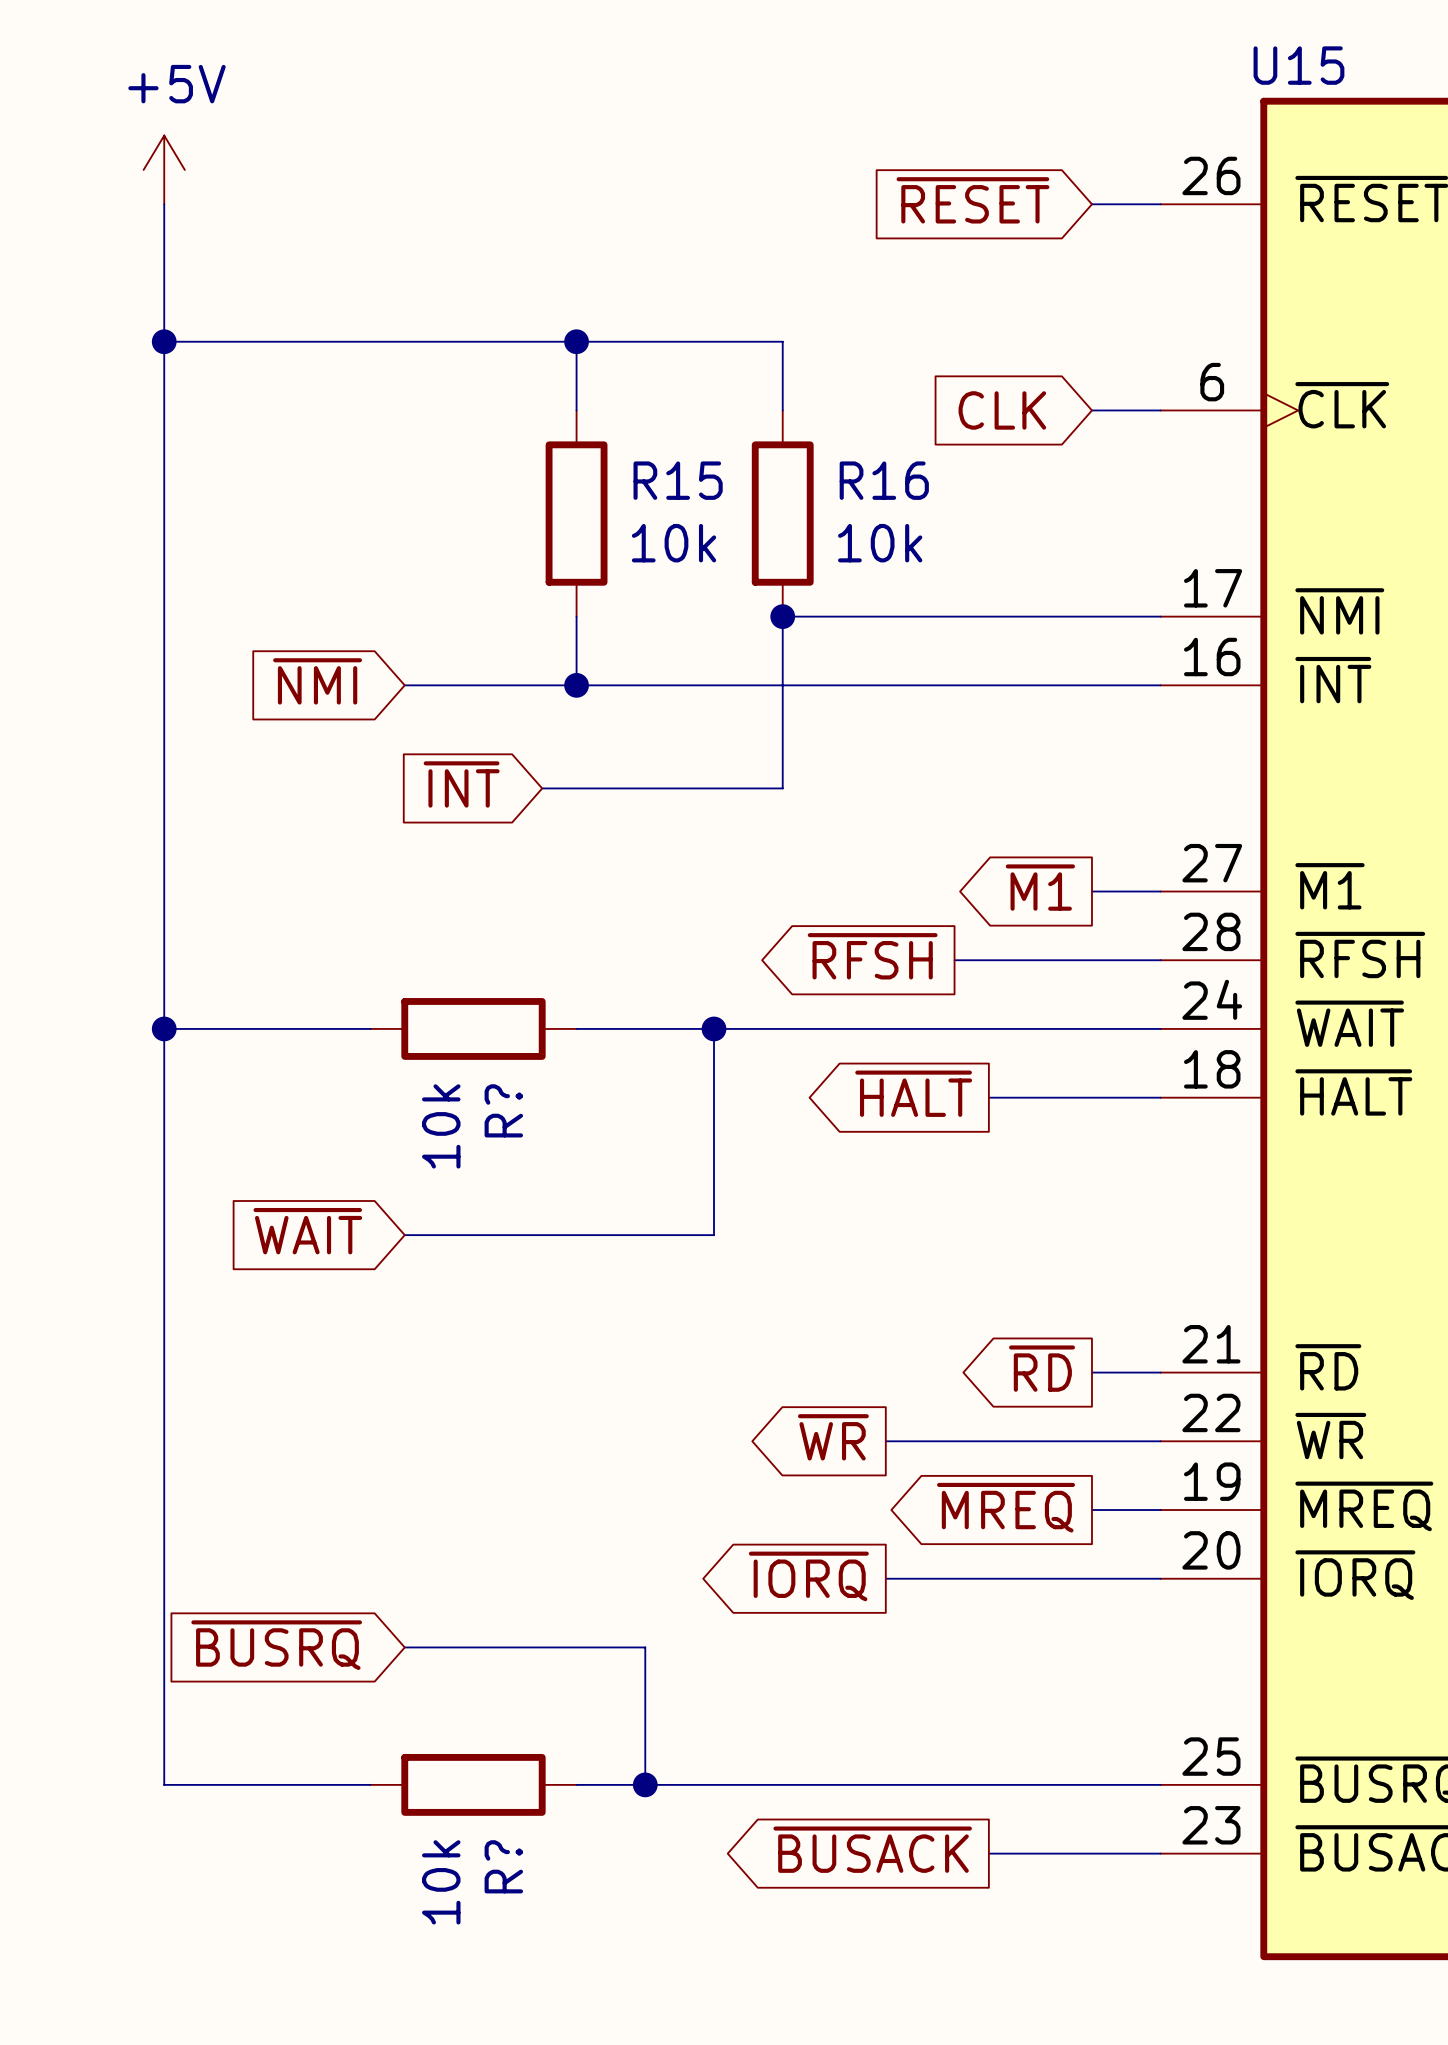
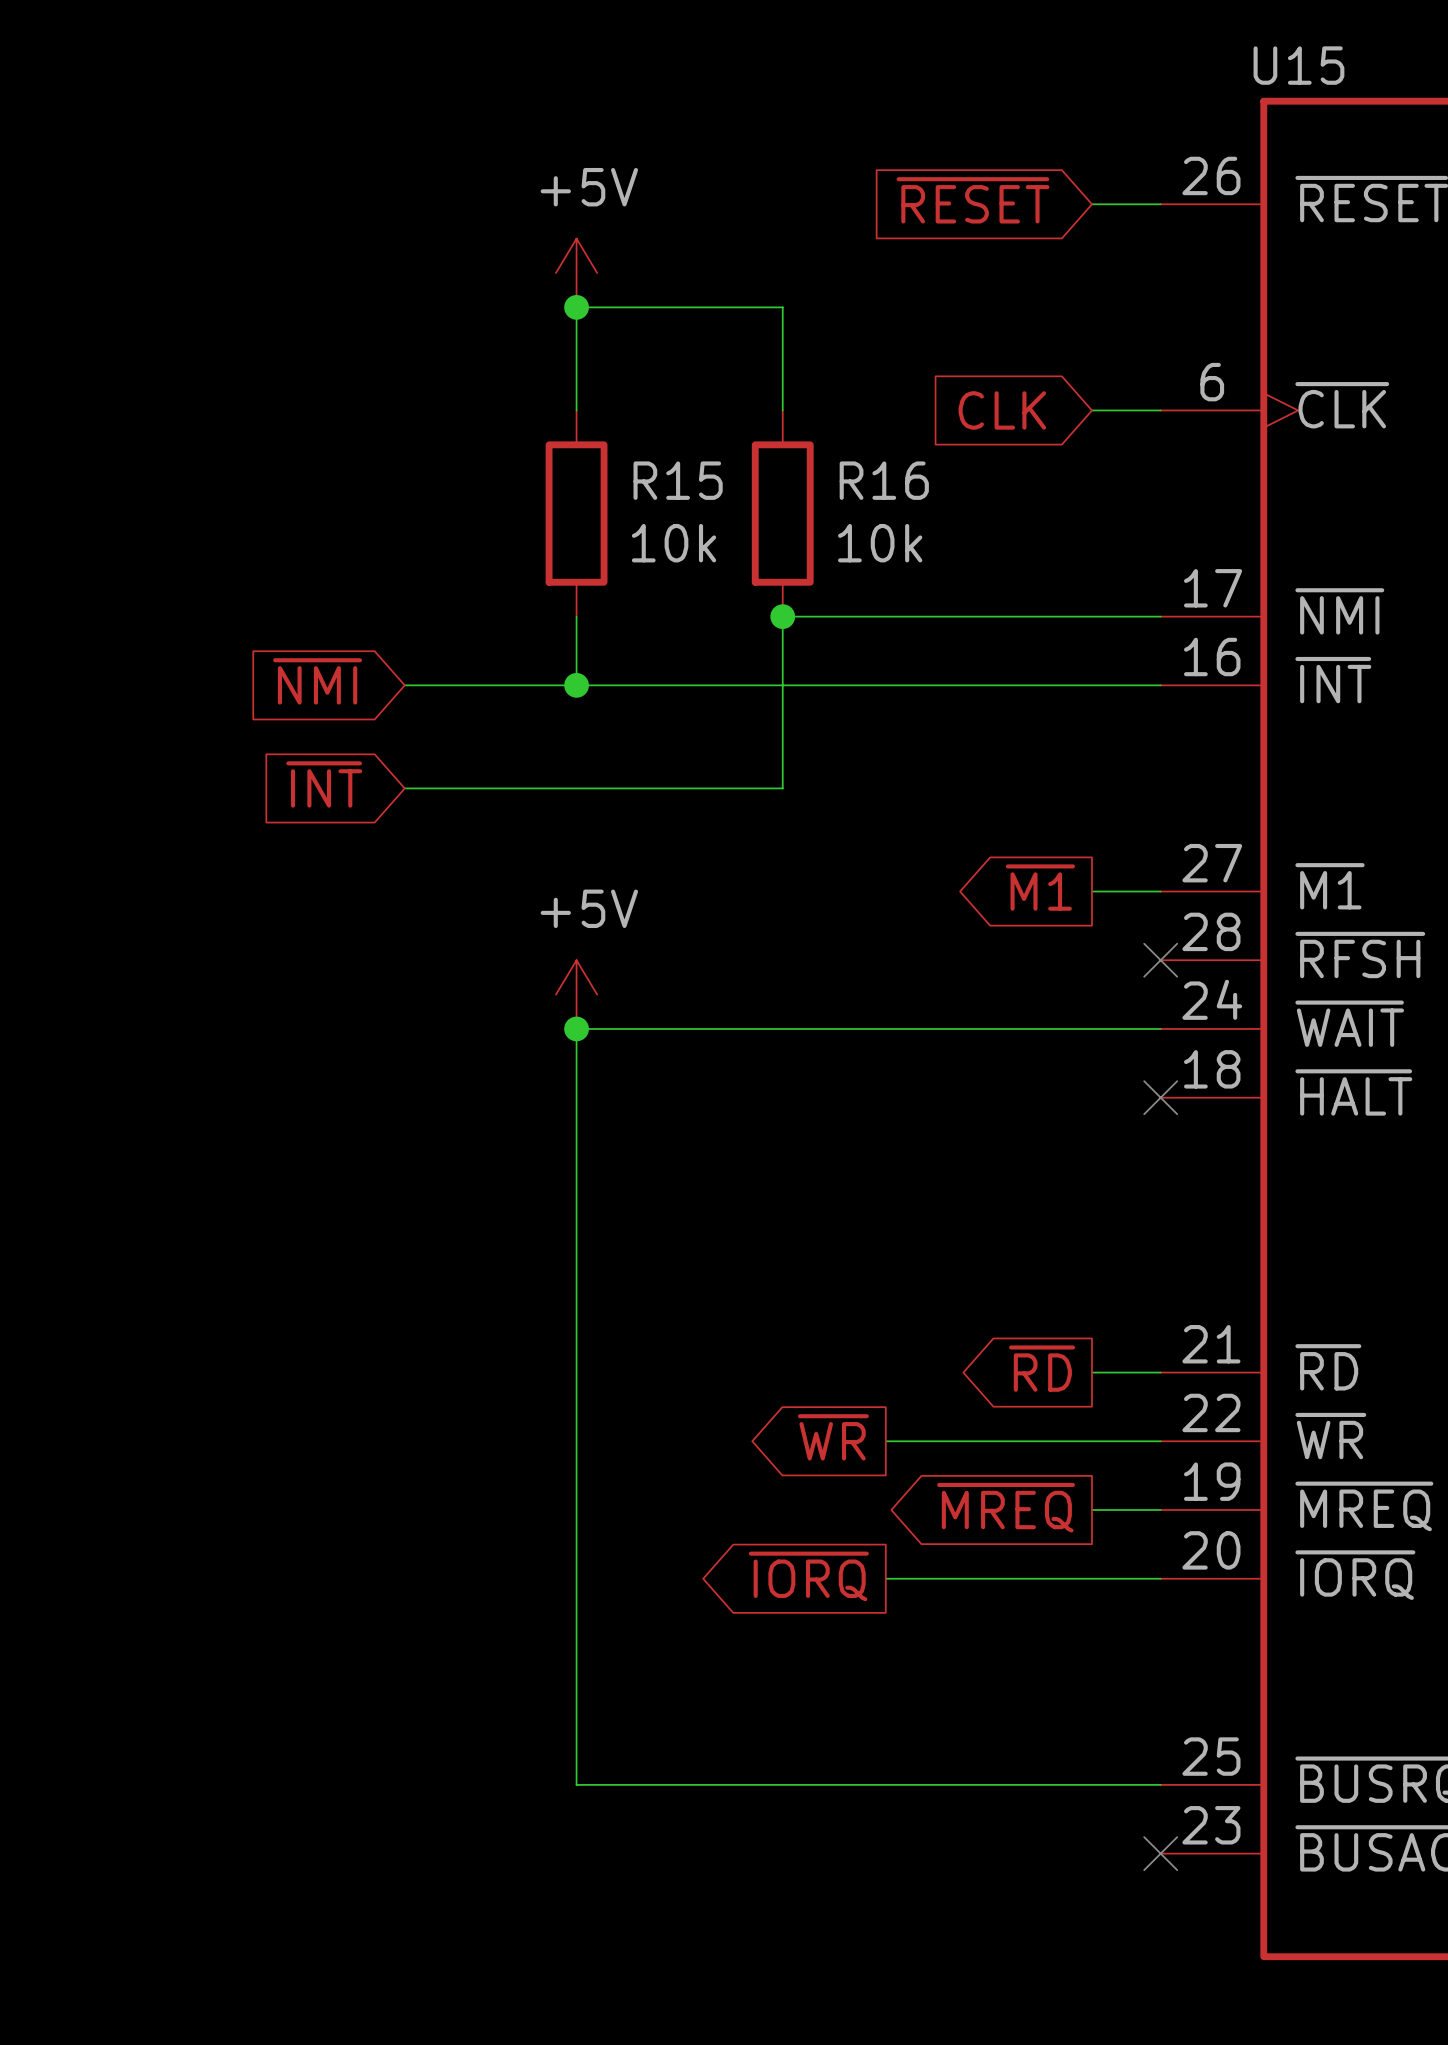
power symbol position: +5V (164, 169) -> +5V (576, 273)
wire: (164, 204) (164, 1784) (370, 1784) -> none
wire: (164, 341) (782, 341) -> (576, 341) (576, 307) (782, 307) (782, 341)
junction: (164, 341) -> none
junction position: (576, 341) -> (576, 307)
global label position: ~{INT} (461, 784) -> ~{INT} (324, 784)
wire: none -> (404, 788) (542, 788)
global label: ~{RFSH} (872, 956) -> none
wire: (954, 960) (1160, 960) -> none
no-connect mark: none -> (1160, 960)
power symbol: none -> +5V (576, 994)
wire: (164, 1028) (370, 1028) -> none
junction: (164, 1028) -> none
R?: 10k (473, 1028) -> none
wire: none -> (576, 1028) (576, 1784)
wire: (714, 1028) (714, 1235) (404, 1235) -> none
junction position: (714, 1028) -> (576, 1028)
global label: ~{HALT} (913, 1093) -> none
wire: (988, 1097) (1160, 1097) -> none
no-connect mark: none -> (1160, 1097)
global label: ~{WAIT} (307, 1231) -> none
global label: ~{BUSRQ} (276, 1645) -> none
wire: (404, 1647) (645, 1647) (645, 1784) -> none
R?: 10k (473, 1784) -> none
junction: (645, 1784) -> none
global label: ~{BUSACK} (872, 1849) -> none
wire: (988, 1853) (1160, 1853) -> none
no-connect mark: none -> (1160, 1853)

